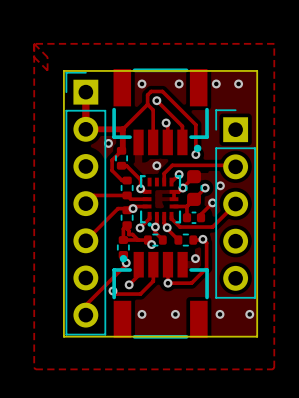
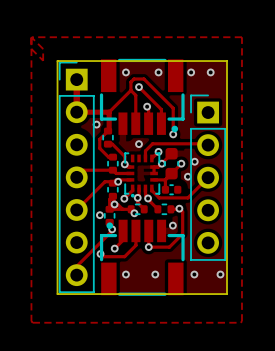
track: (212, 202) (201, 214) (201, 217) -> none
via: none -> (114, 204)
via: none -> (99, 215)

